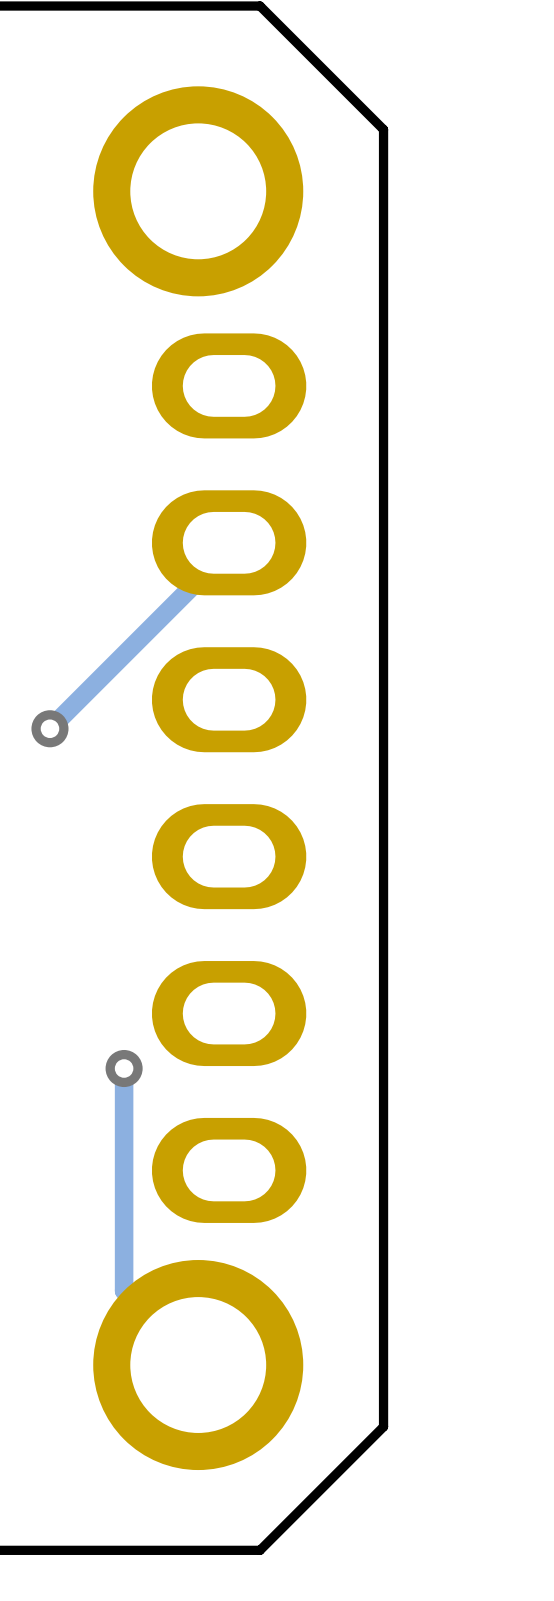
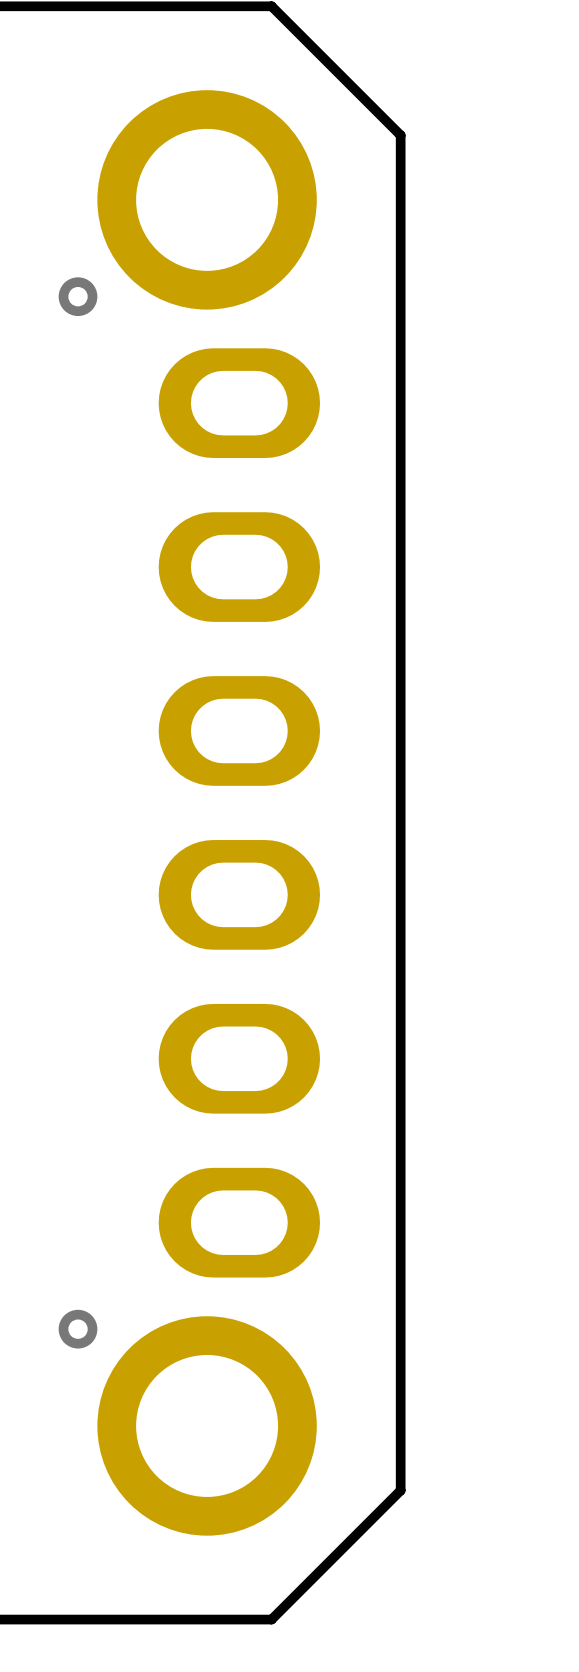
via: none -> (78, 296)
track: (229, 549) (49, 728) -> none
via: (49, 728) -> none
track: (124, 1068) (124, 1290) (198, 1365) -> none
via position: (124, 1068) -> (78, 1329)

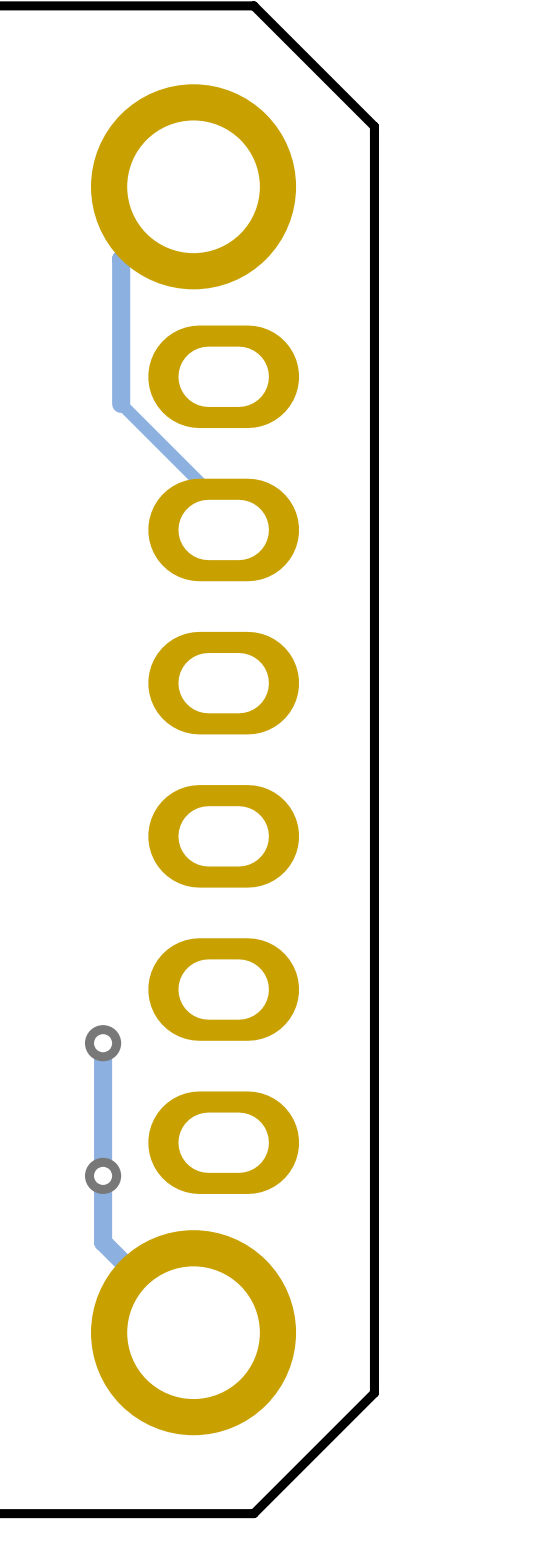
track: none -> (193, 186) (121, 259) (121, 403) (223, 506)
via: (78, 296) -> none
track: none -> (103, 1043) (103, 1242) (193, 1332)
via: none -> (103, 1043)
via position: (78, 1329) -> (103, 1175)

